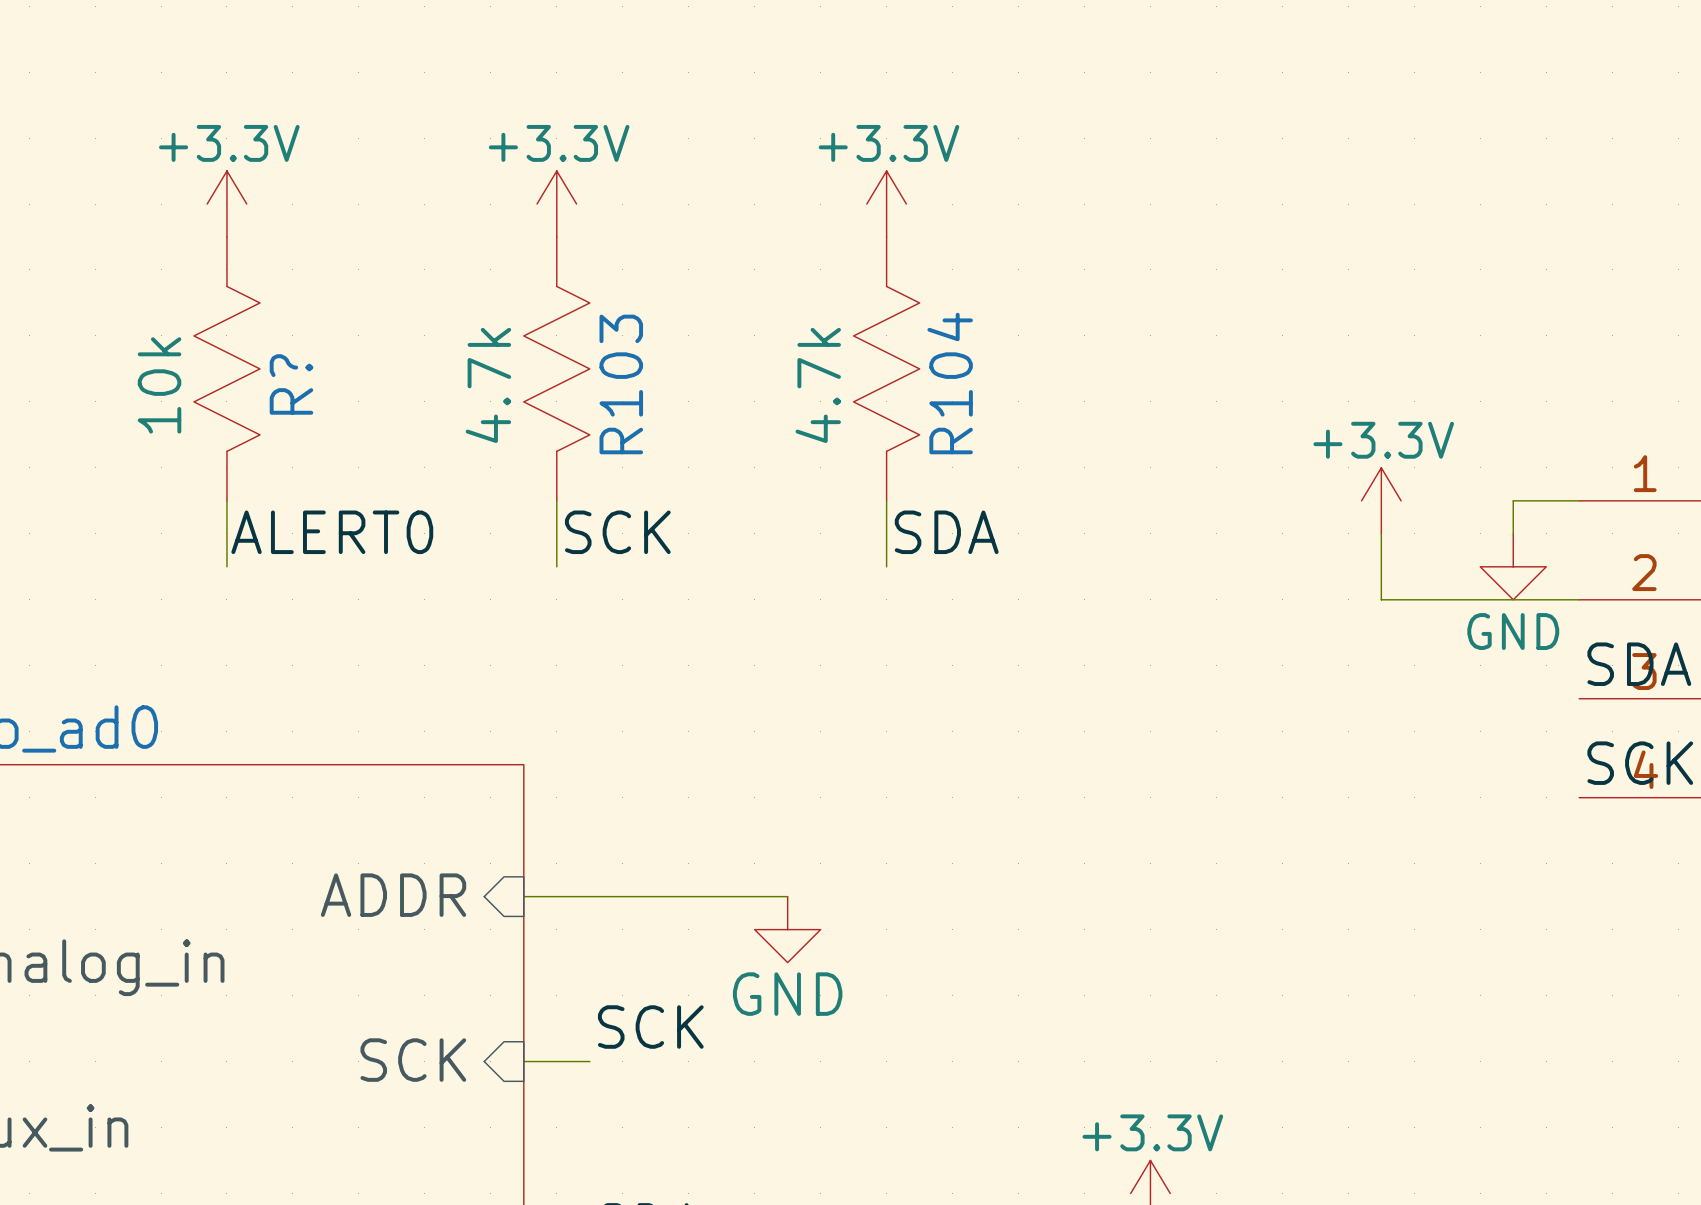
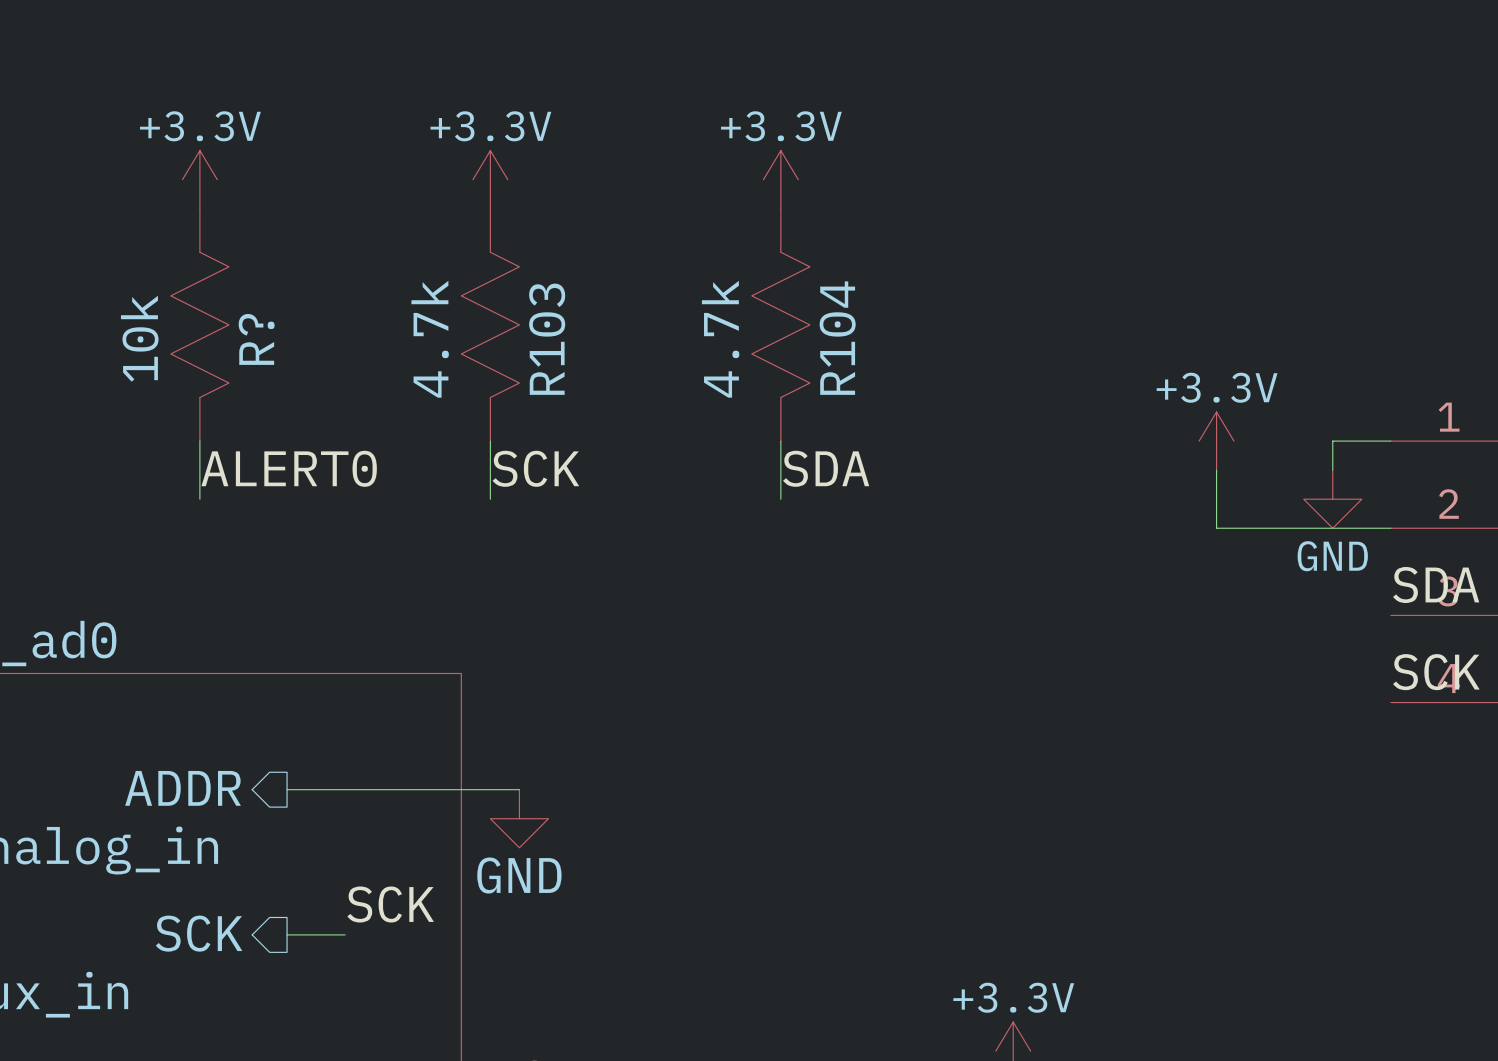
sheet pin position: ADDR (393, 895) -> ADDR (183, 788)
wire: (589, 896) (787, 896) -> (287, 789) (461, 789)
power symbol position: GND (787, 929) -> GND (519, 818)
label position: SCK (650, 1027) -> SCK (390, 904)
sheet pin position: SCK (413, 1060) -> SCK (199, 933)
wire: (523, 1061) (589, 1061) -> (287, 934) (345, 934)

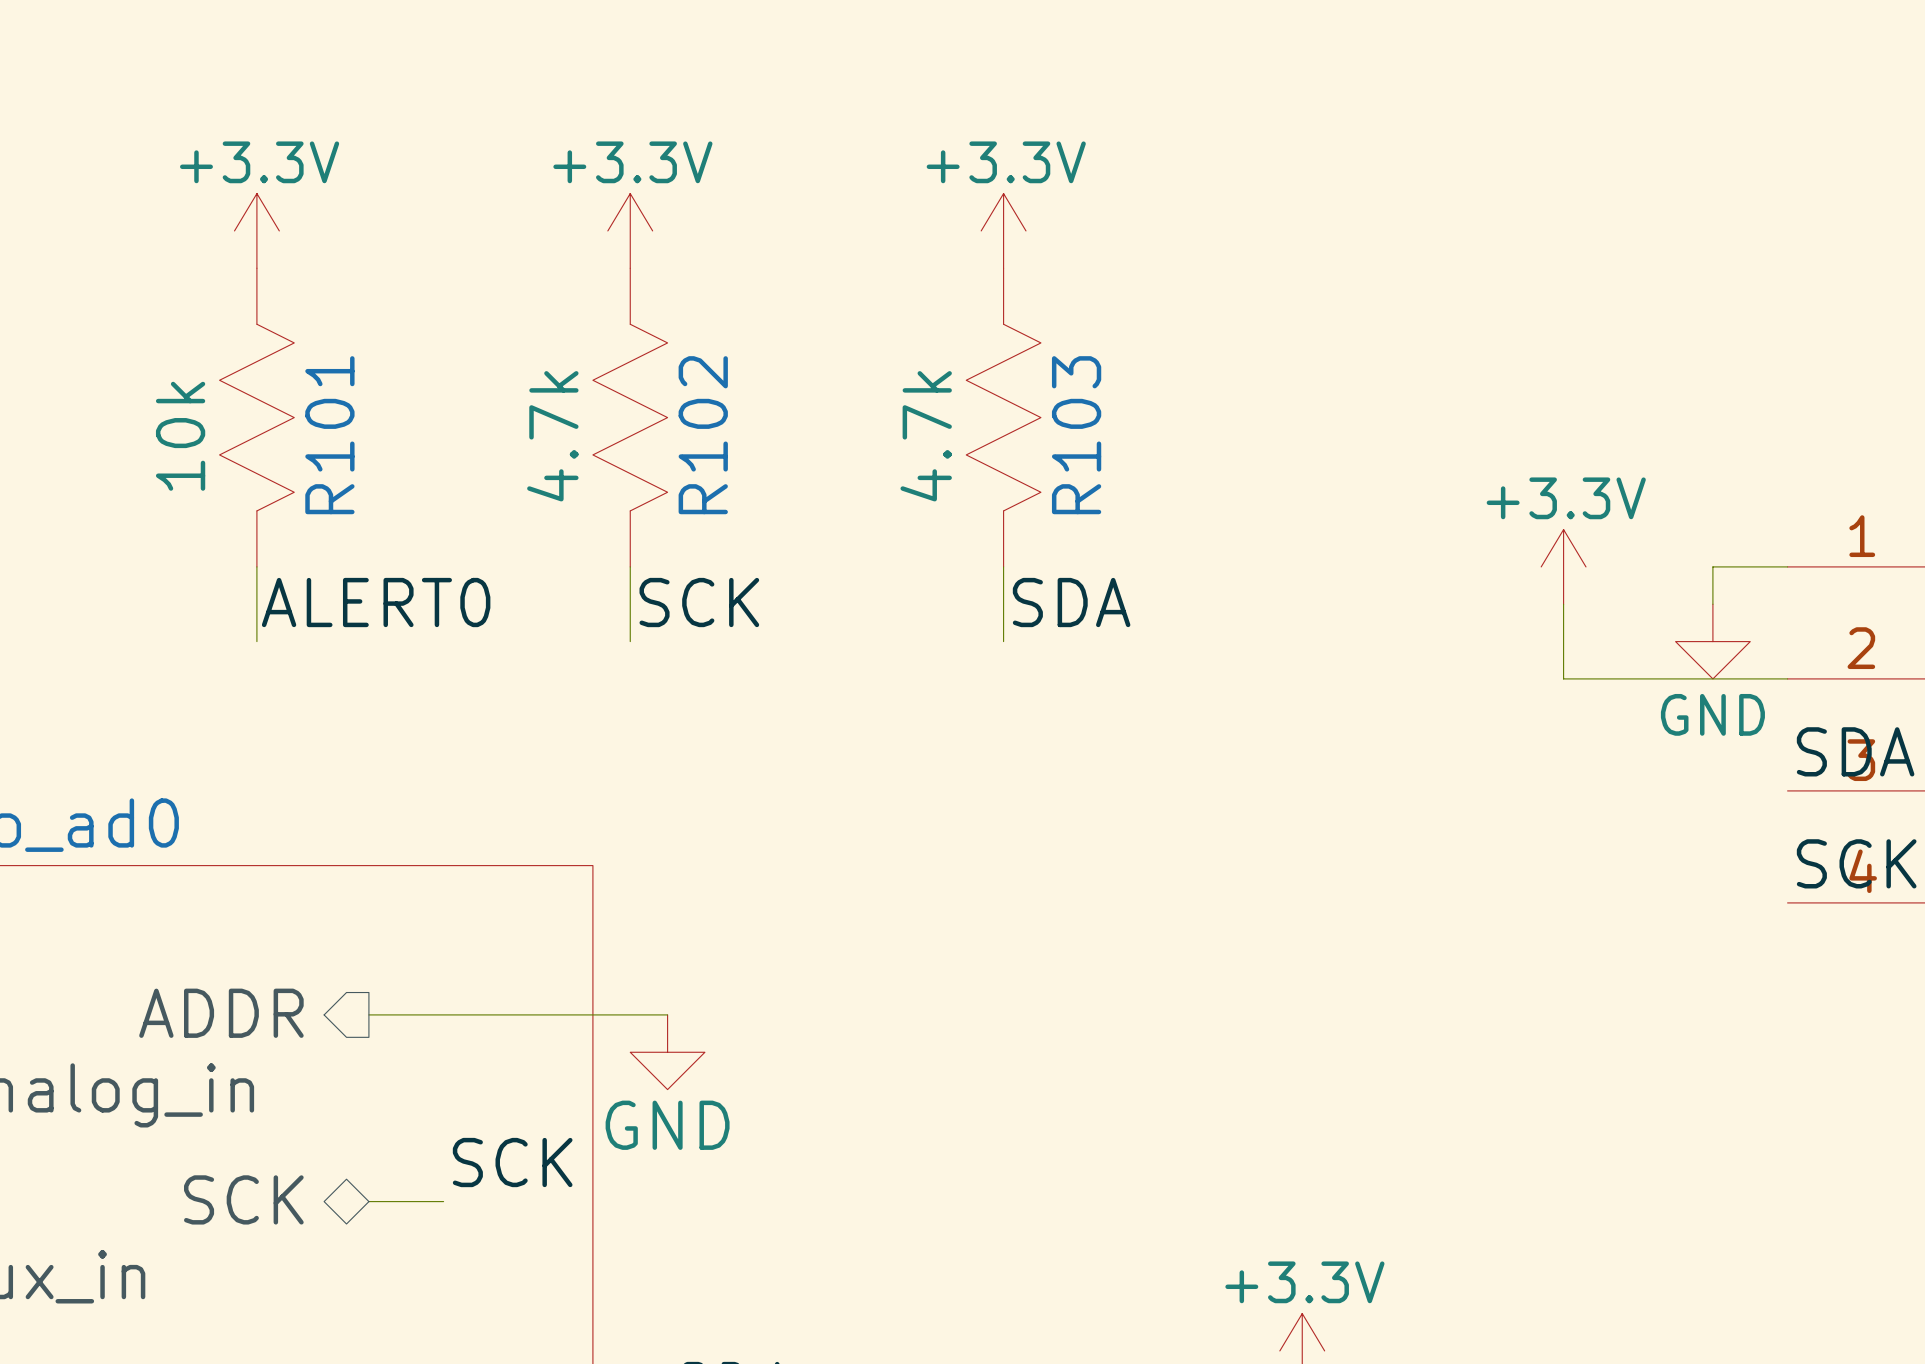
R104 name: R104 (837, 338) -> R103 (1076, 435)
R? name: R? (256, 339) -> R101 (329, 435)
R103 name: R103 (547, 339) -> R102 (703, 435)
sheet pin shape: input (199, 933) -> bidirectional (243, 1199)

